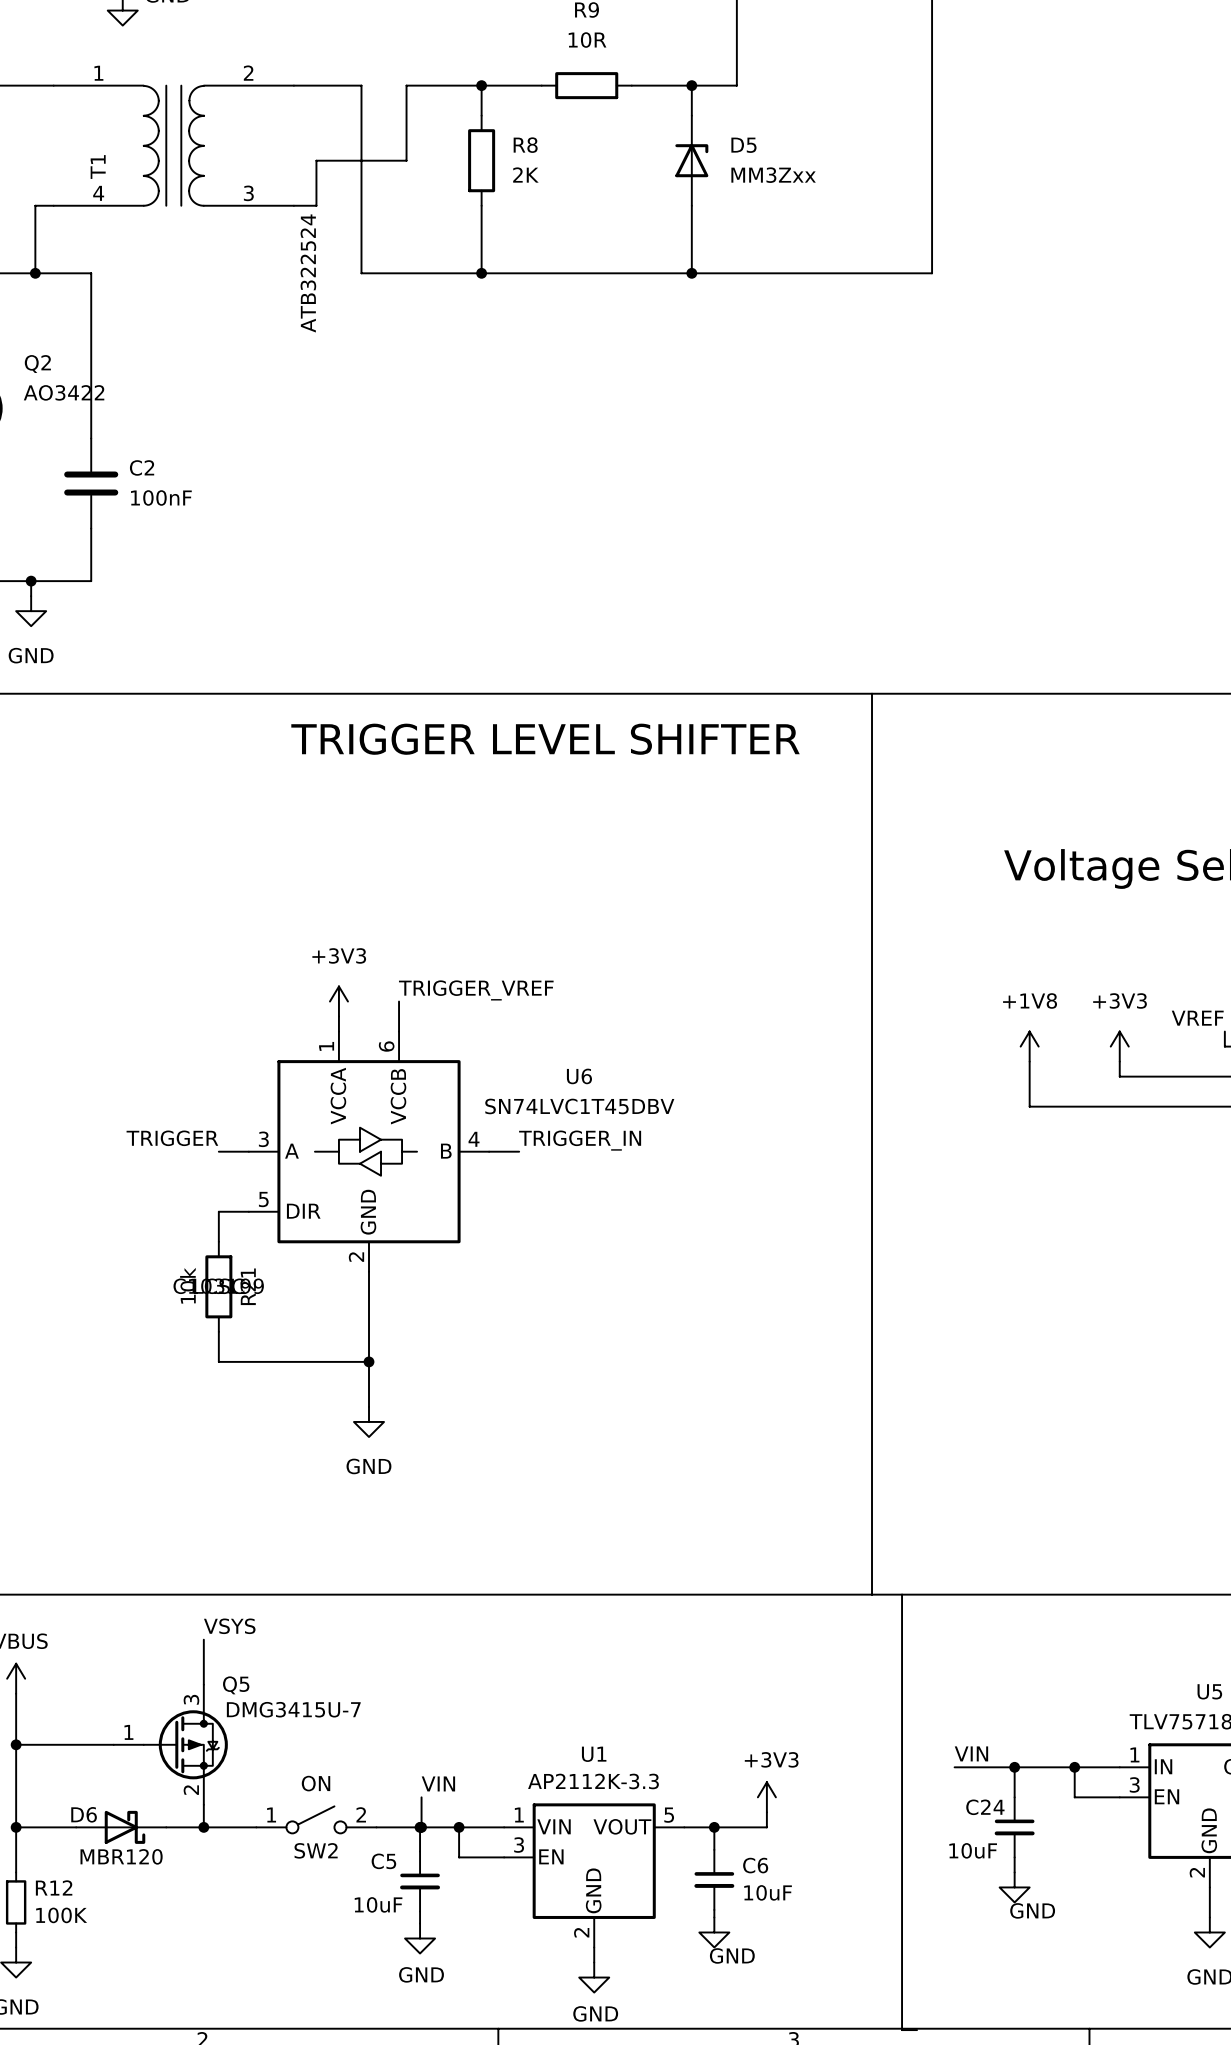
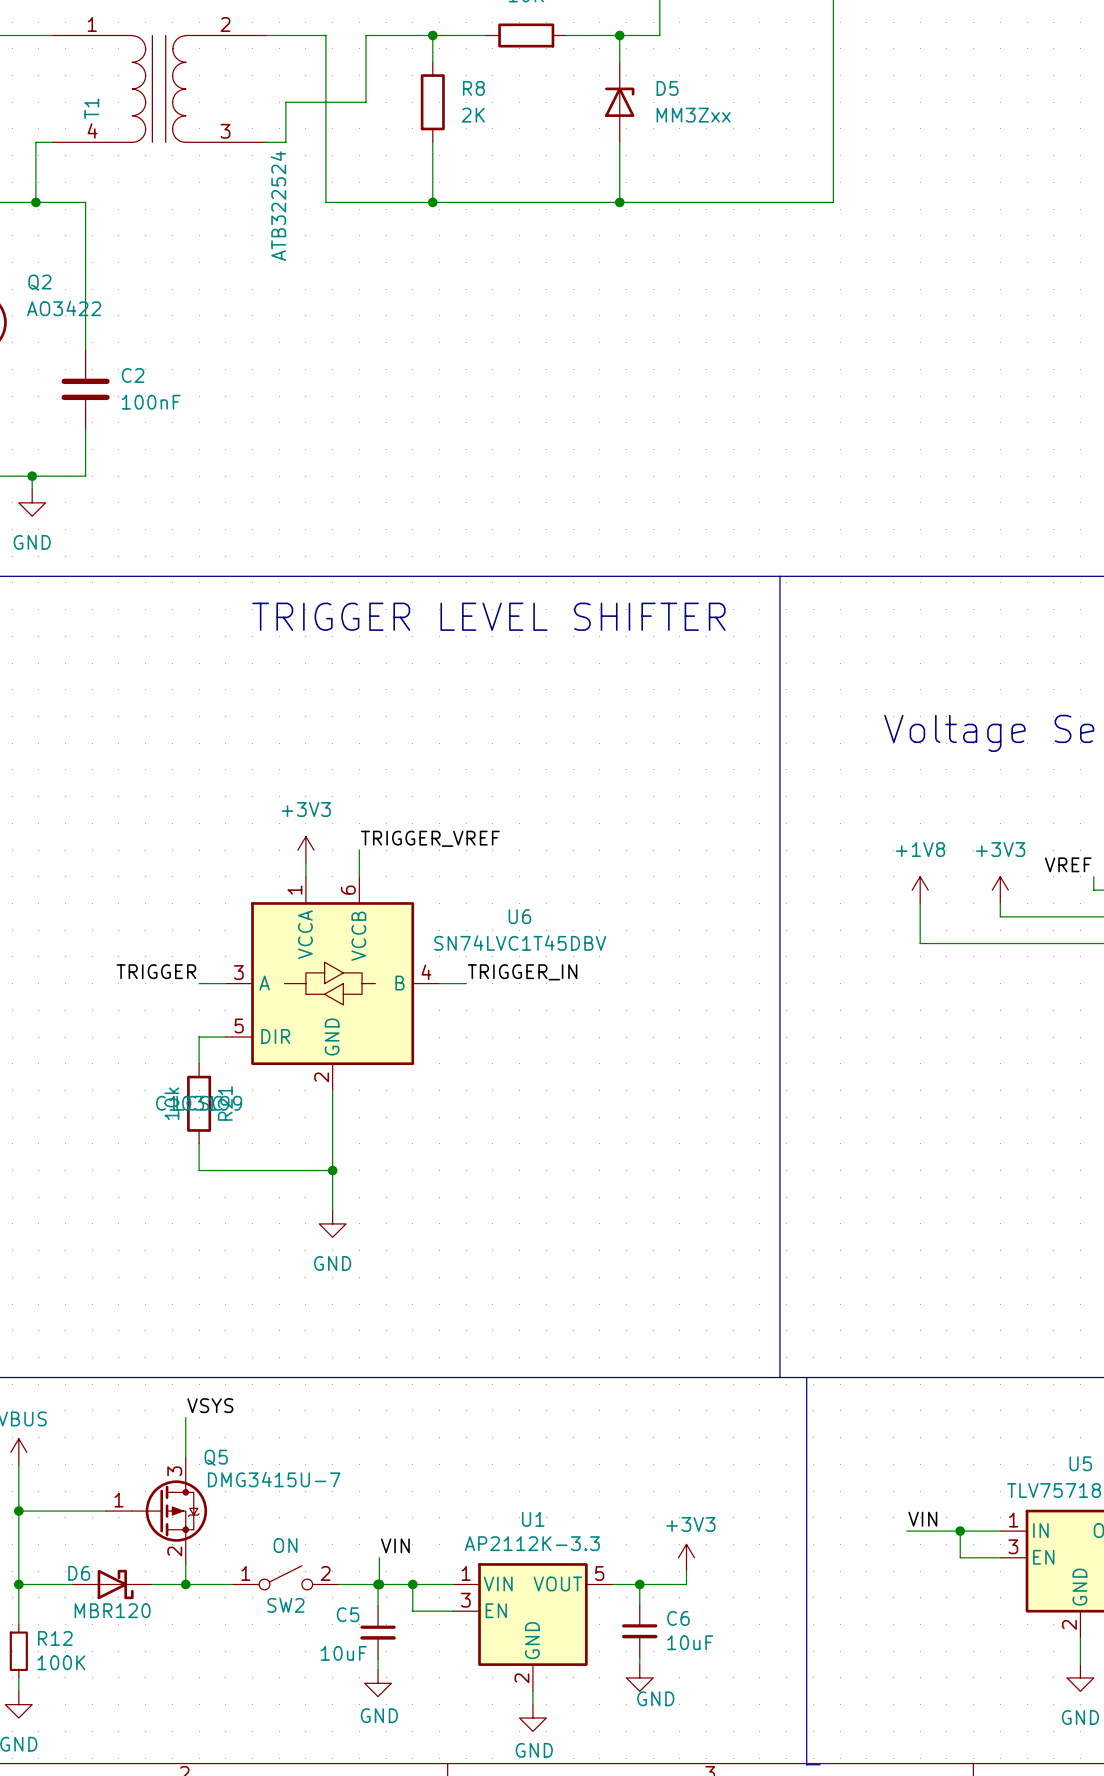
label position: VIN (971, 1753) -> VIN (922, 1519)
wire: (954, 1767) (1014, 1767) (1014, 1797) -> none
junction: (1014, 1767) -> none
C24: 10uF (1014, 1827) -> none
wire: (1014, 1857) (1014, 1872) -> none
power symbol: GND (1014, 1887) -> none

